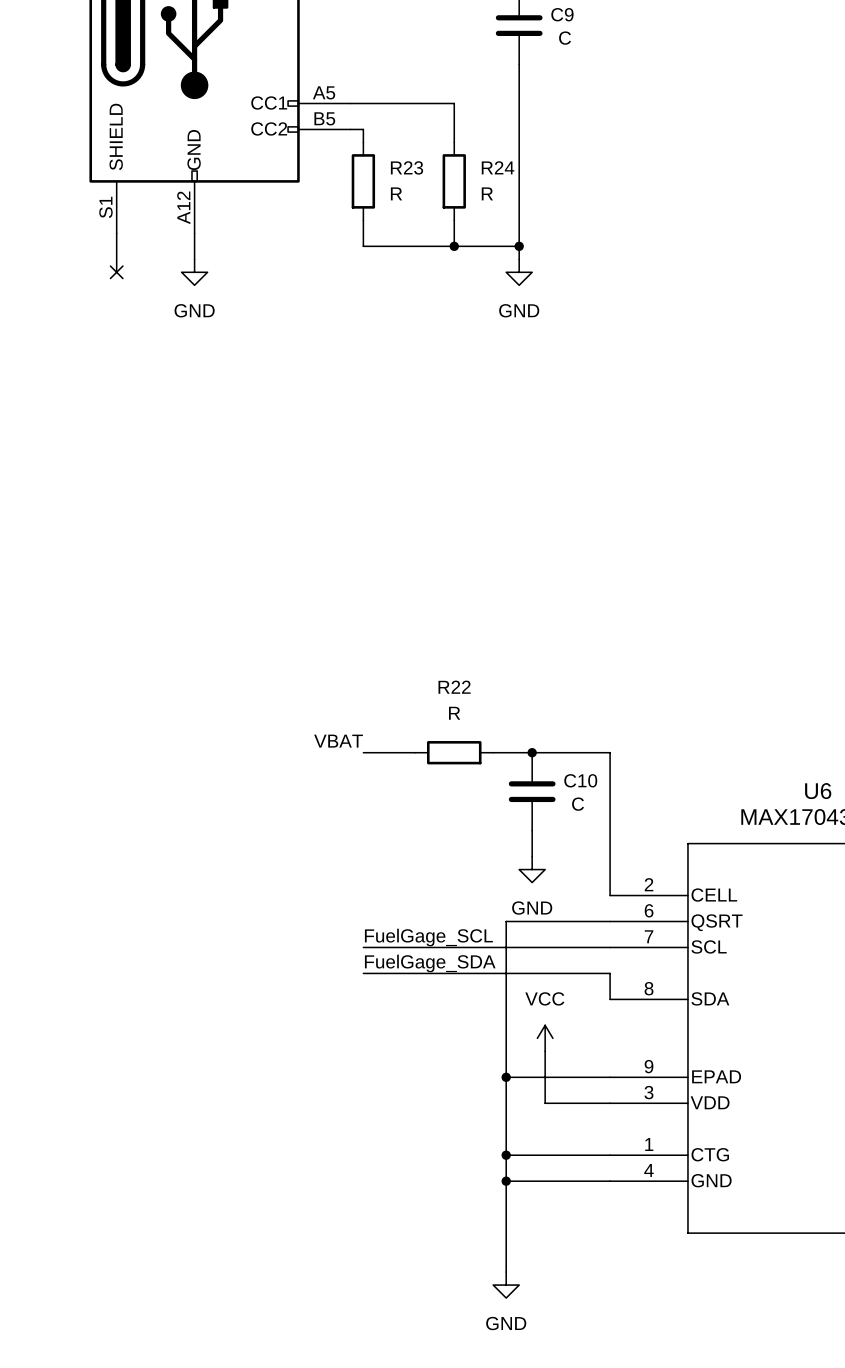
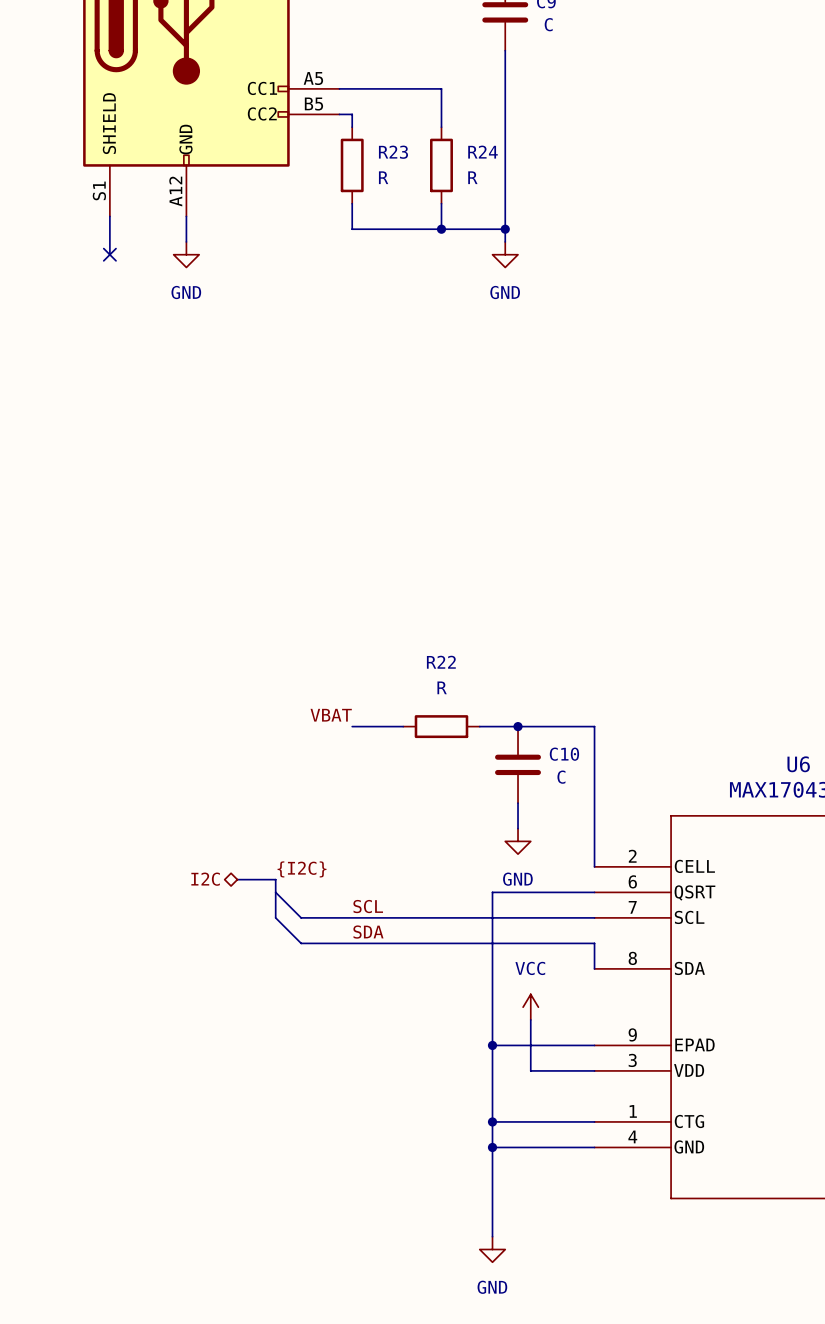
label: none -> {I2C} (302, 869)
hierarchical label: none -> I2C (205, 879)
bus: none -> (237, 879) (275, 879) (275, 917)
wire: none -> (275, 892) (301, 917) (352, 917)
label: FuelGage_SCL (428, 937) -> SCL (368, 906)
wire: none -> (275, 917) (301, 943) (352, 943)
label: FuelGage_SDA (430, 963) -> SDA (368, 932)

